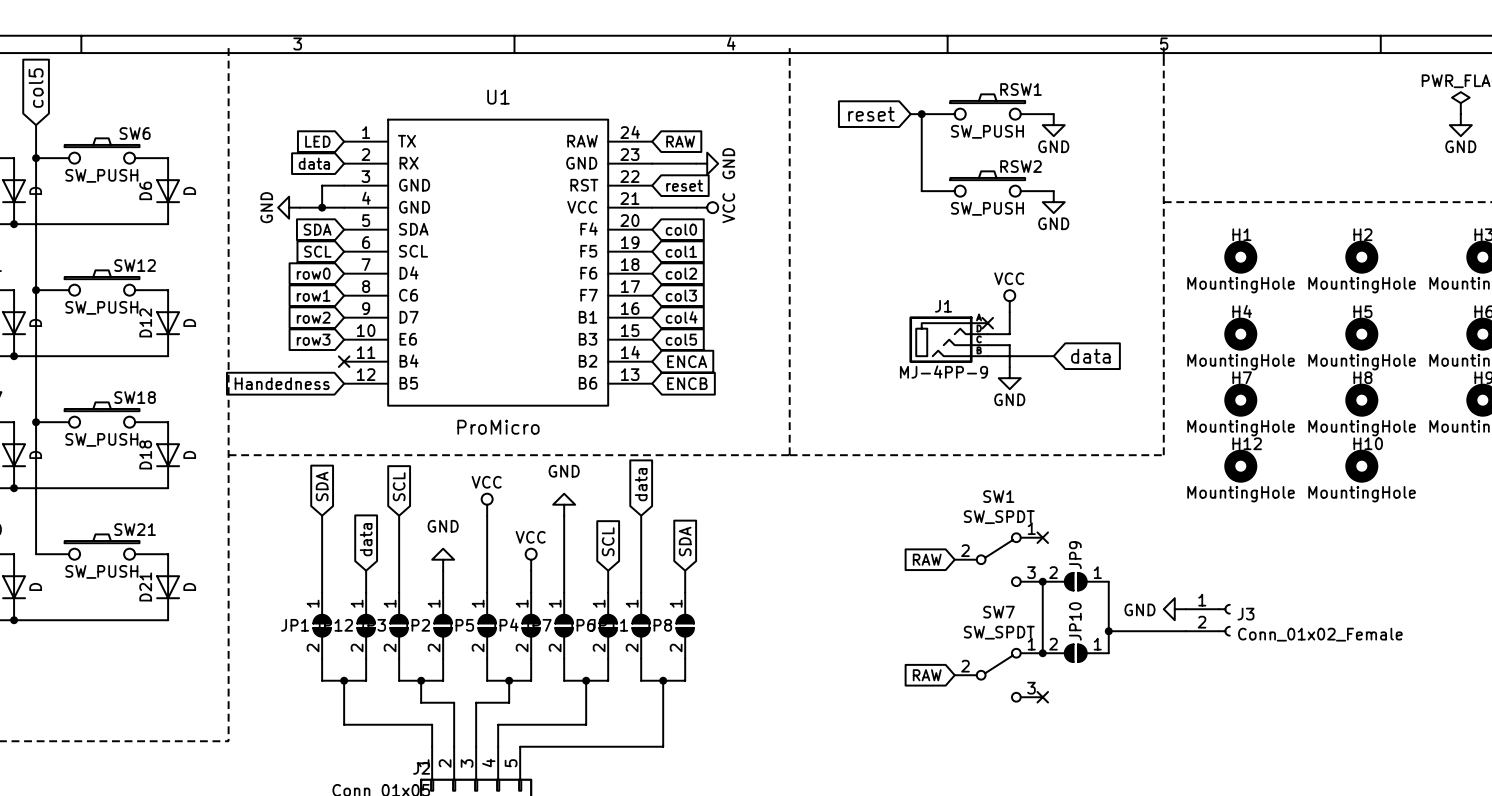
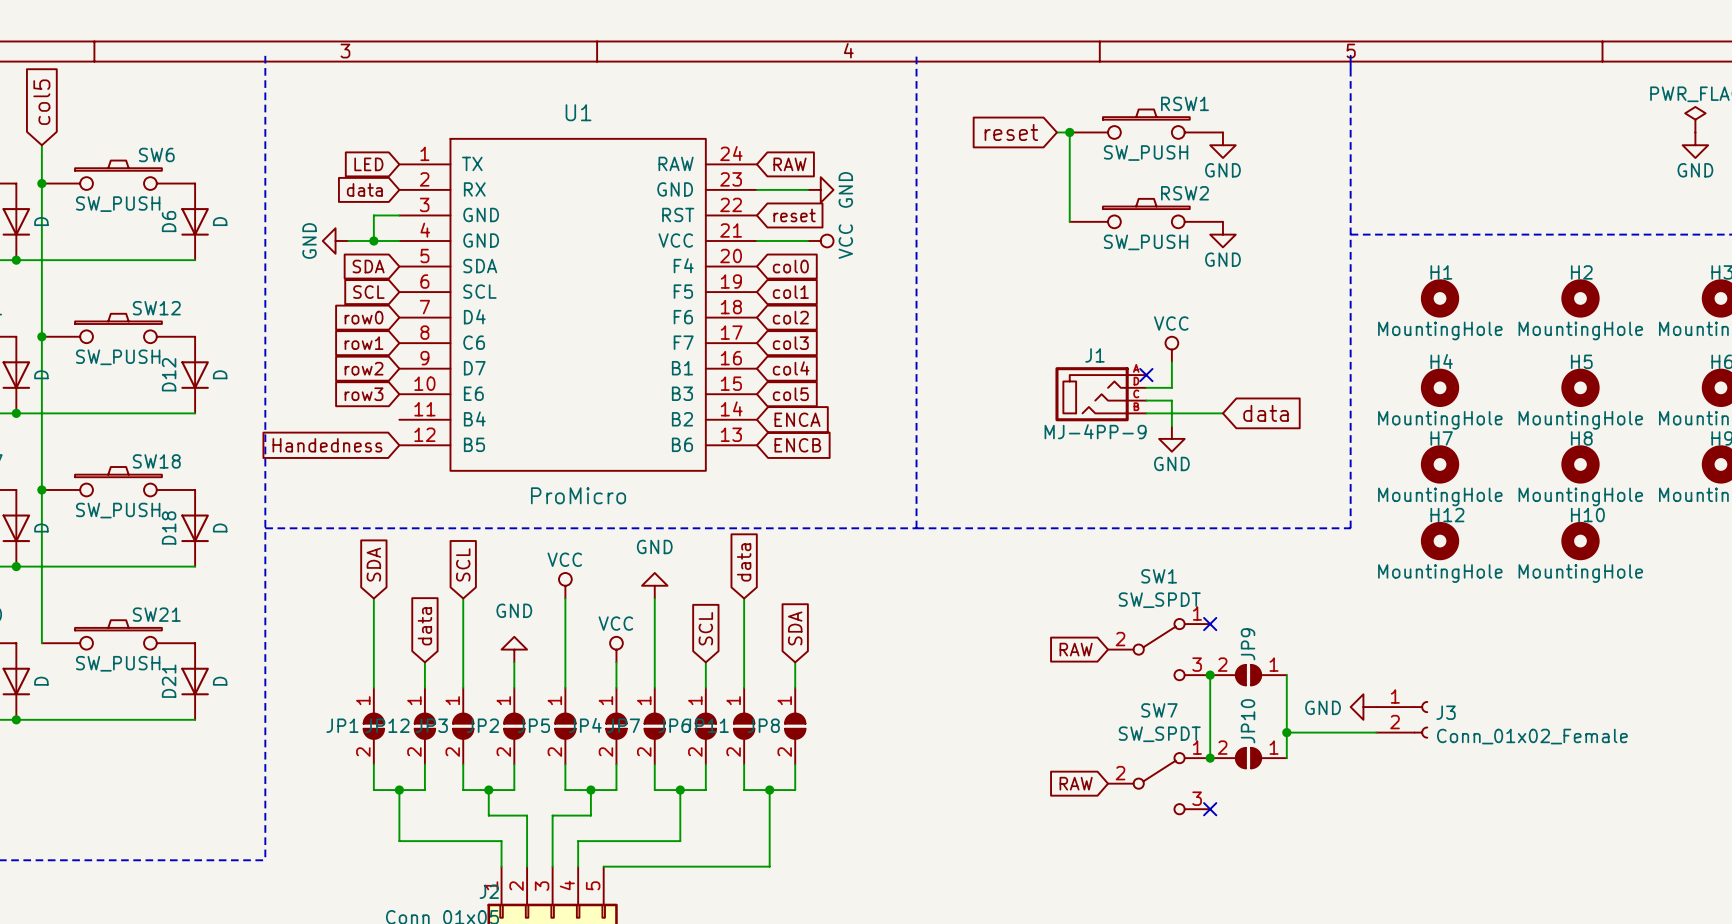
no-connect mark: (344, 361) -> none

